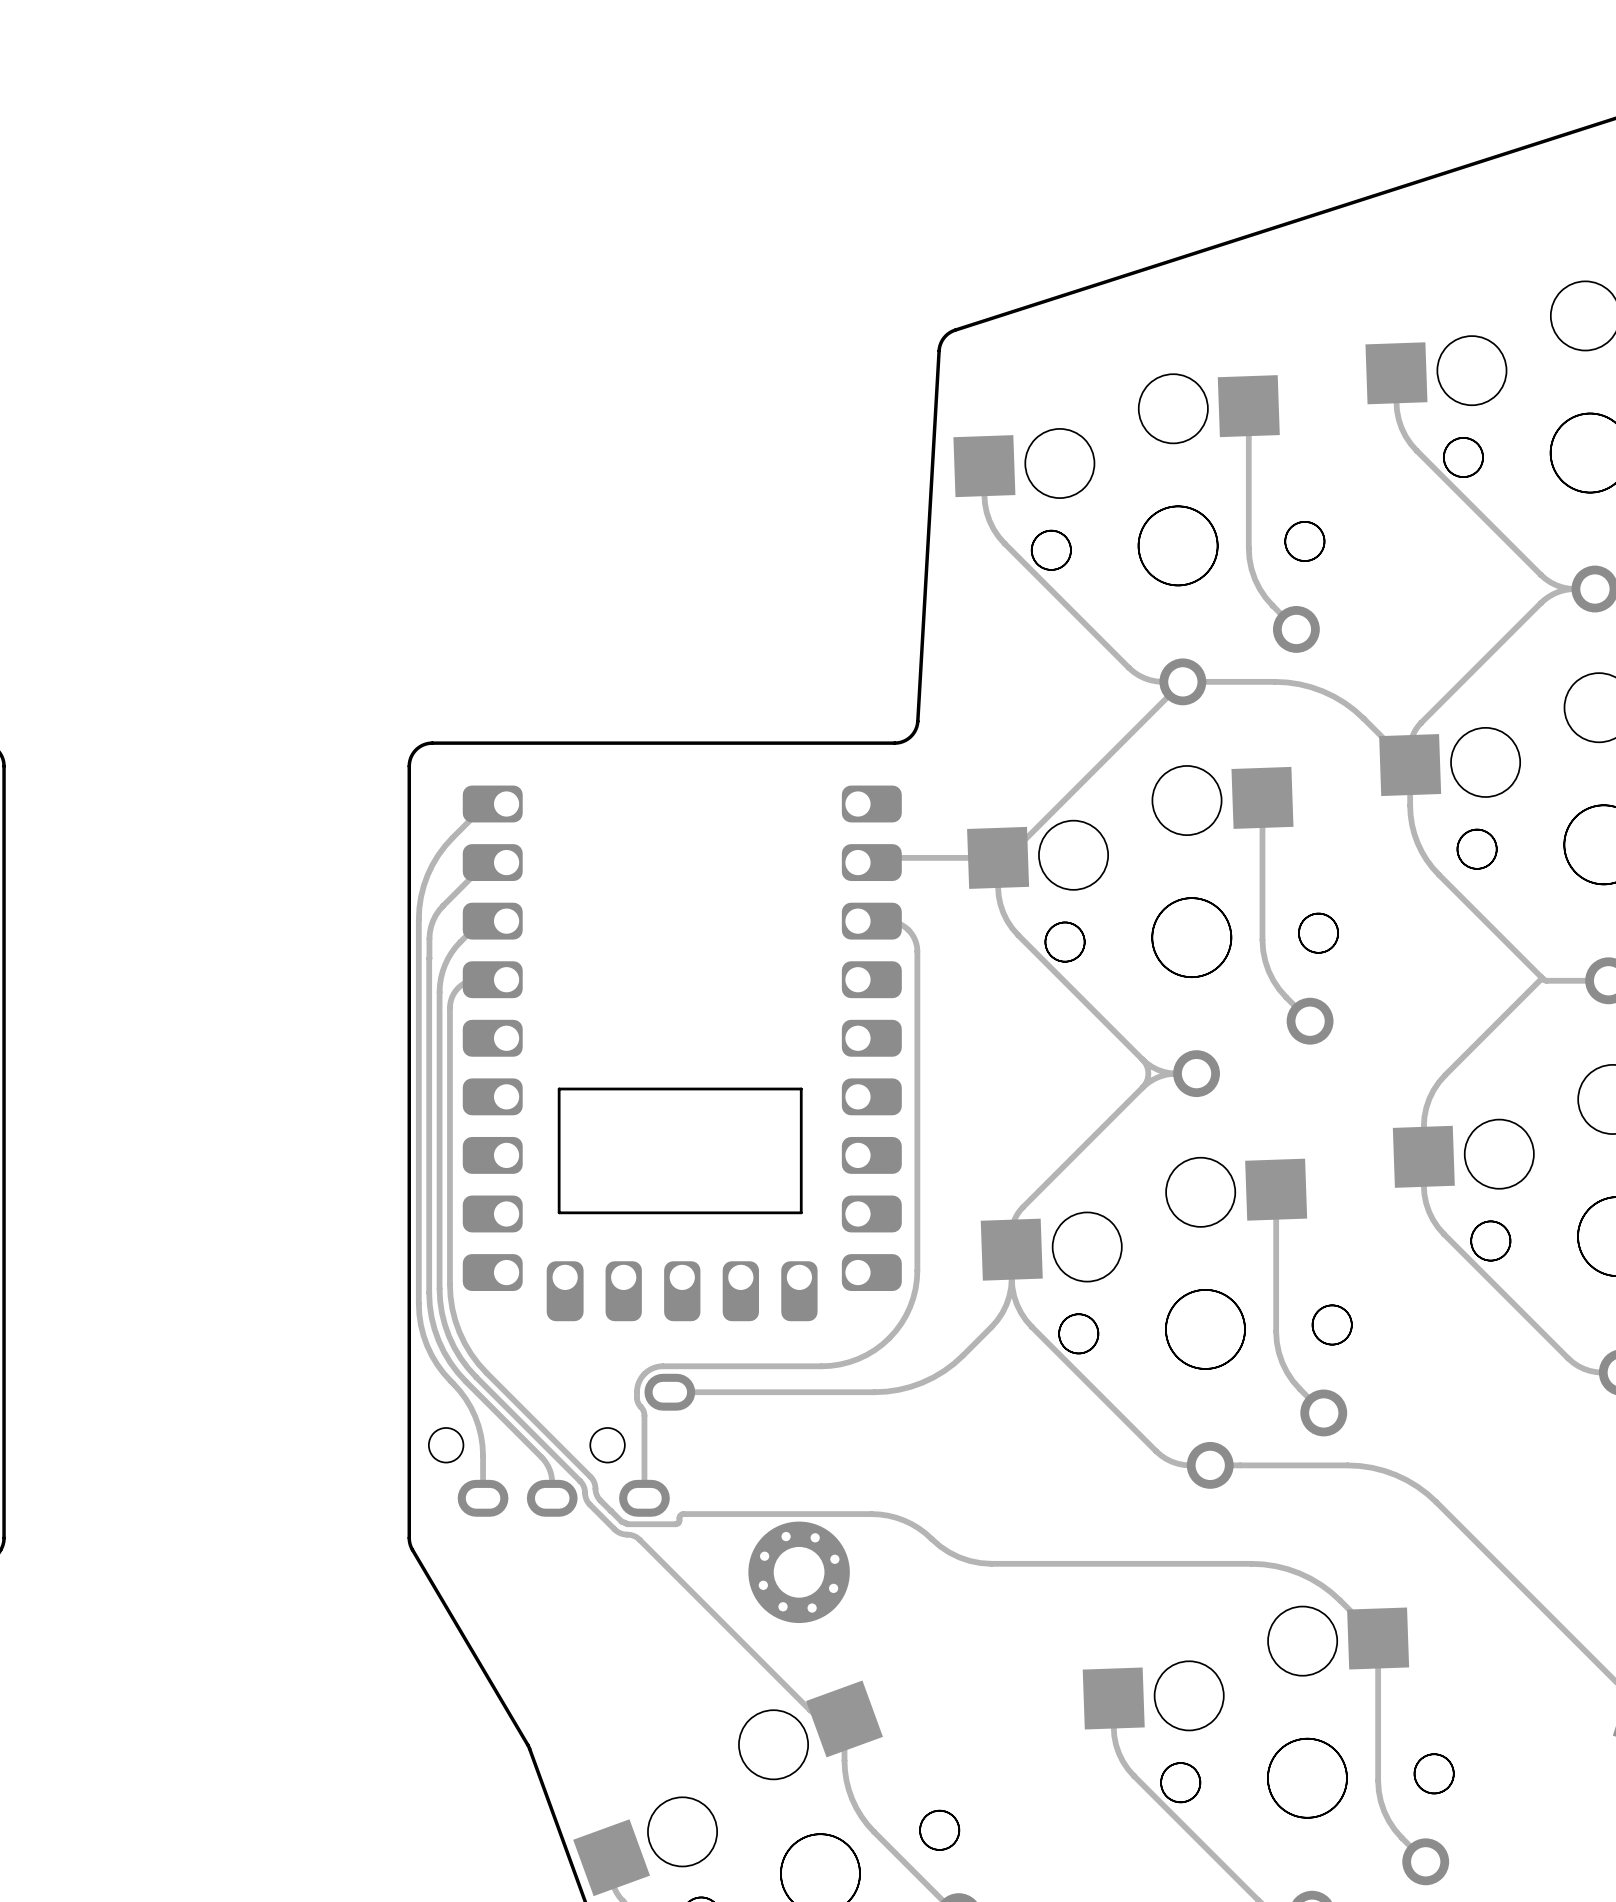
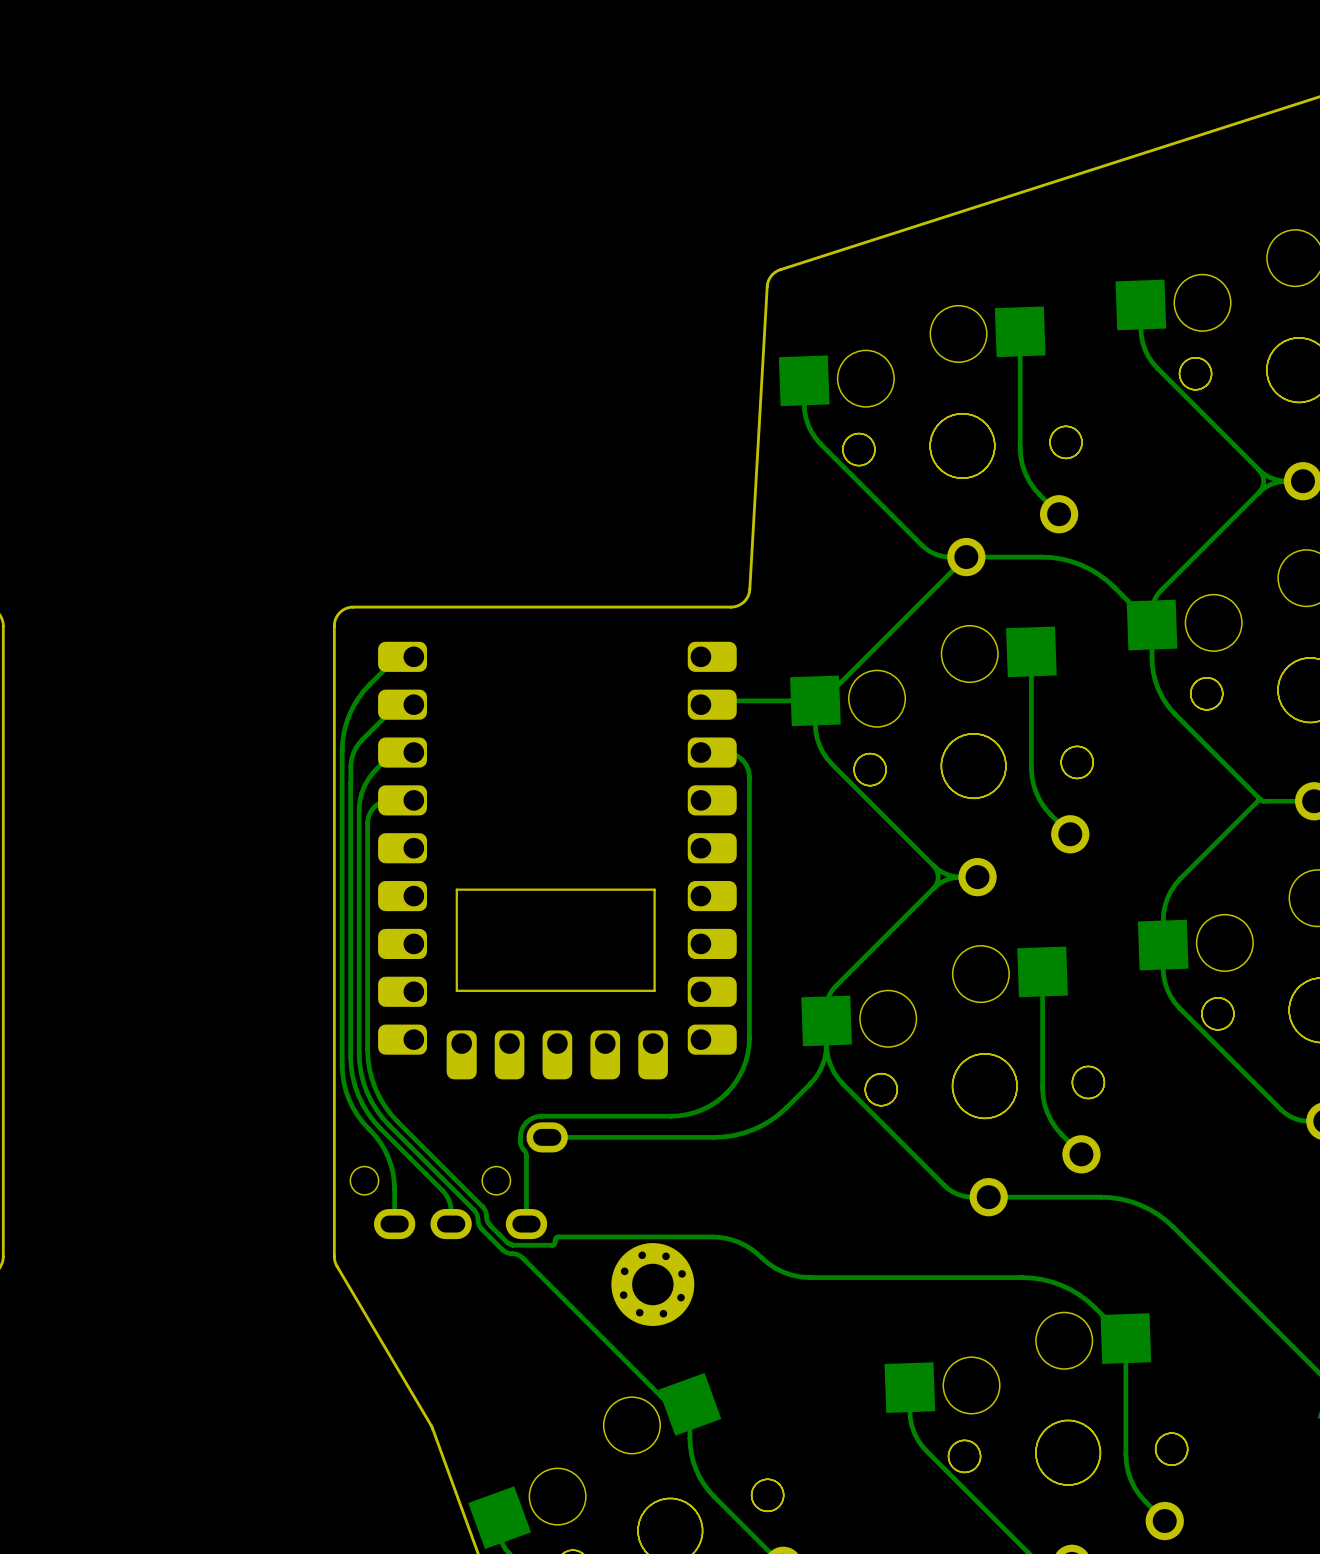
track: none -> (1258, 469) (1263, 481) (1258, 492)

